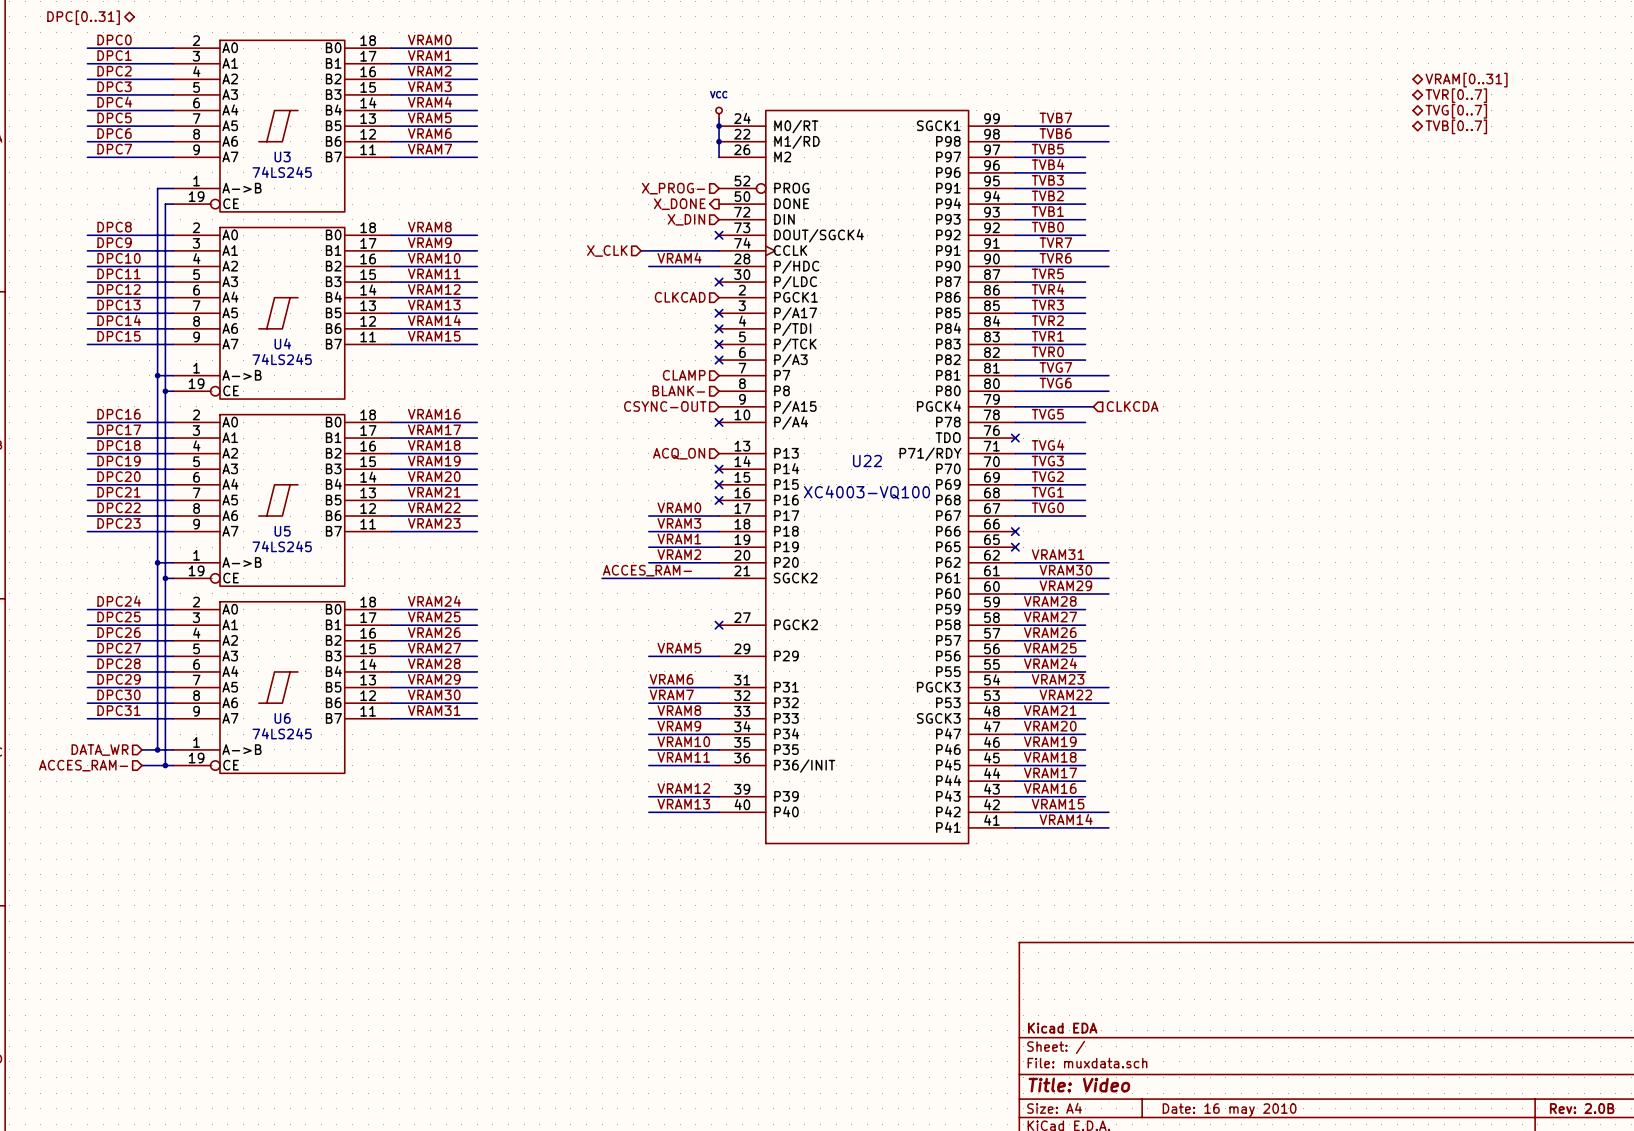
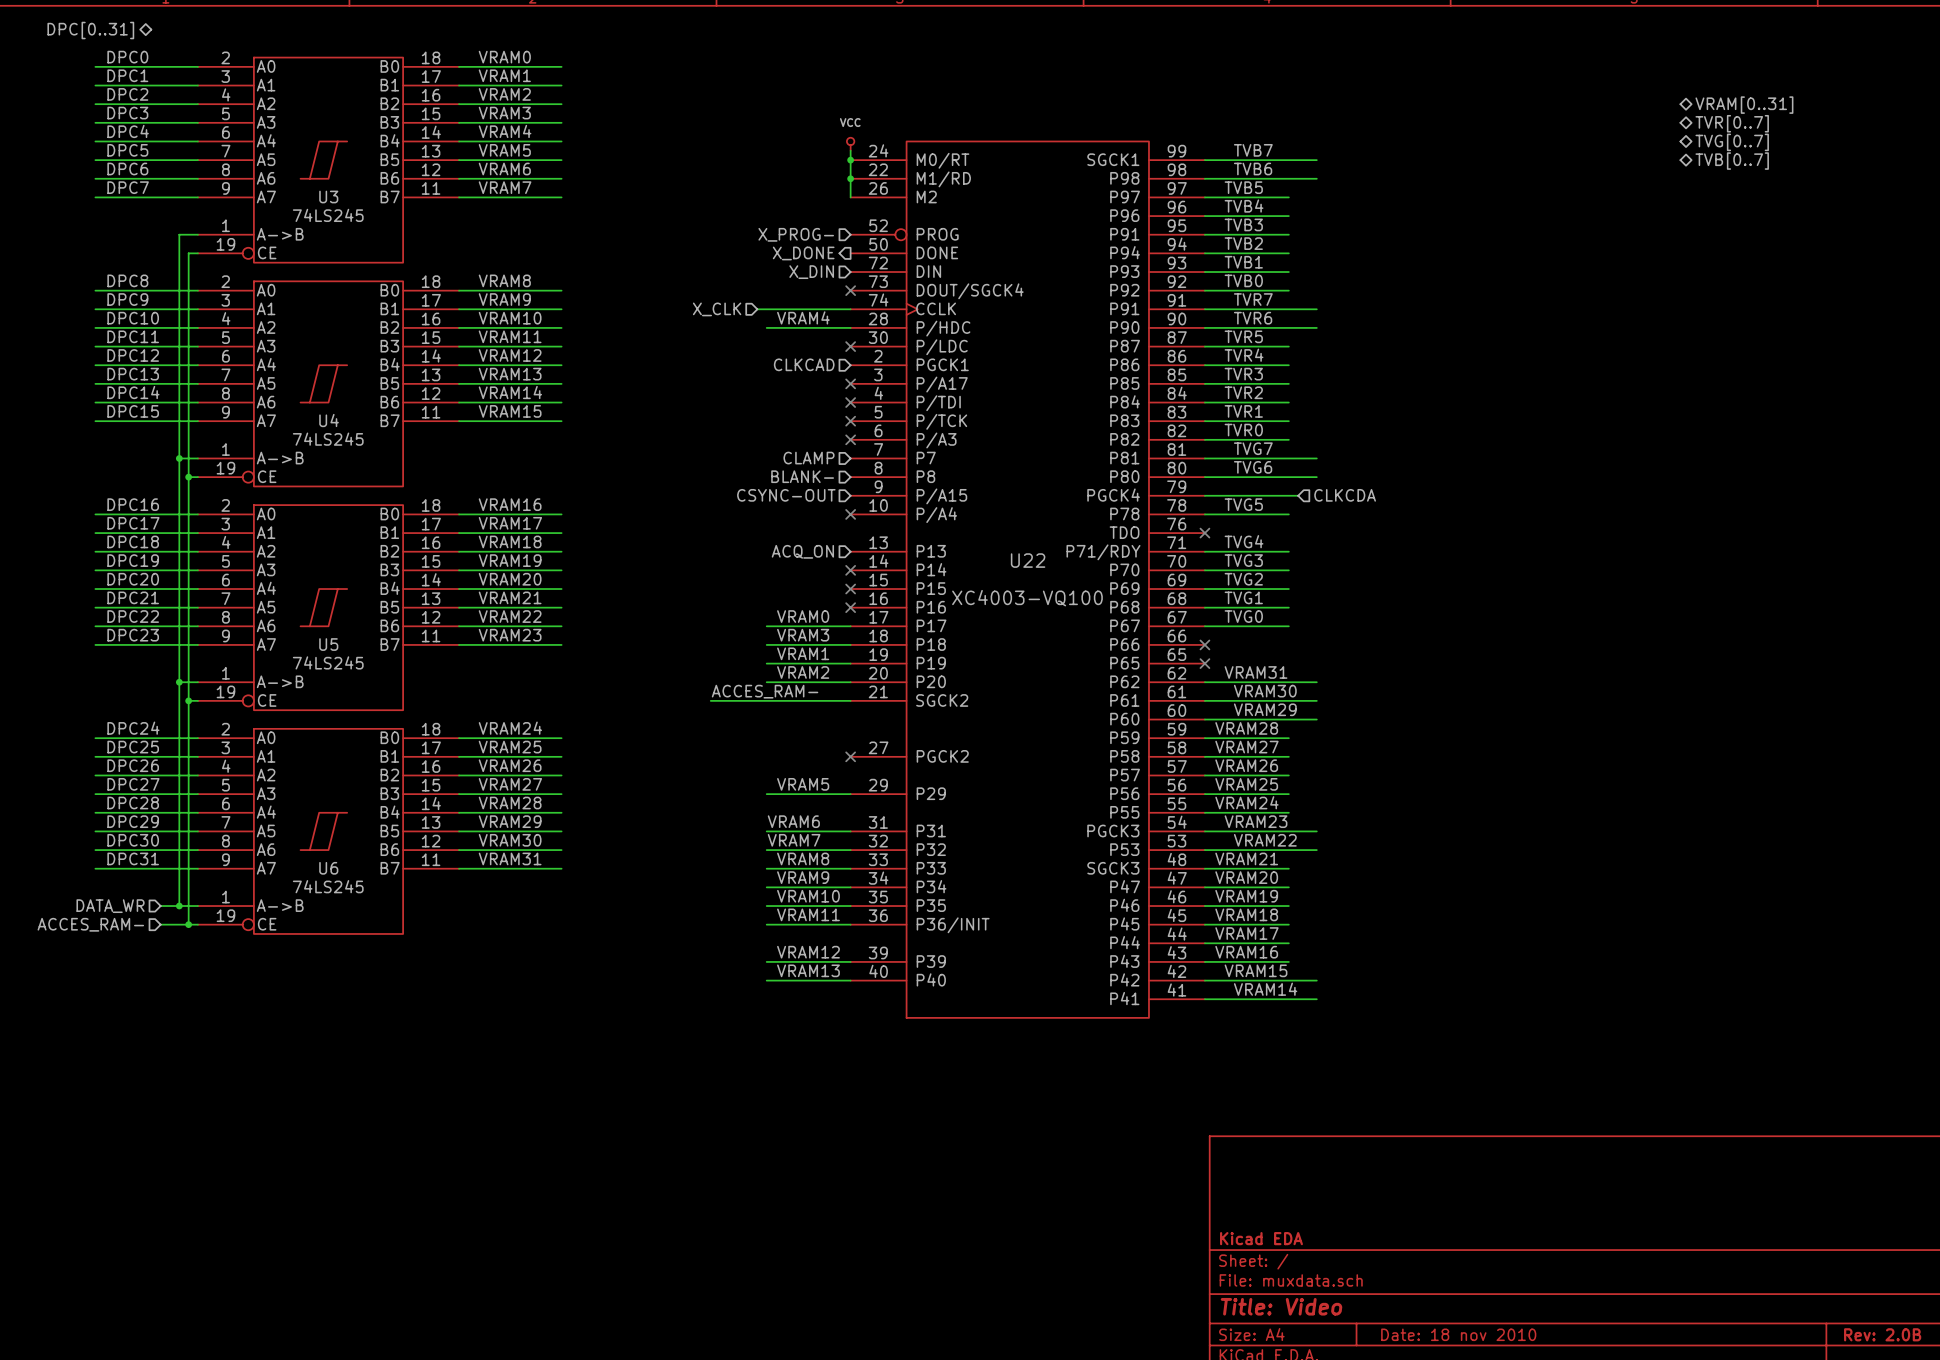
title block: Date: 16 may 2010 (1229, 1110) -> Date: 18 nov 2010 (1458, 1334)

